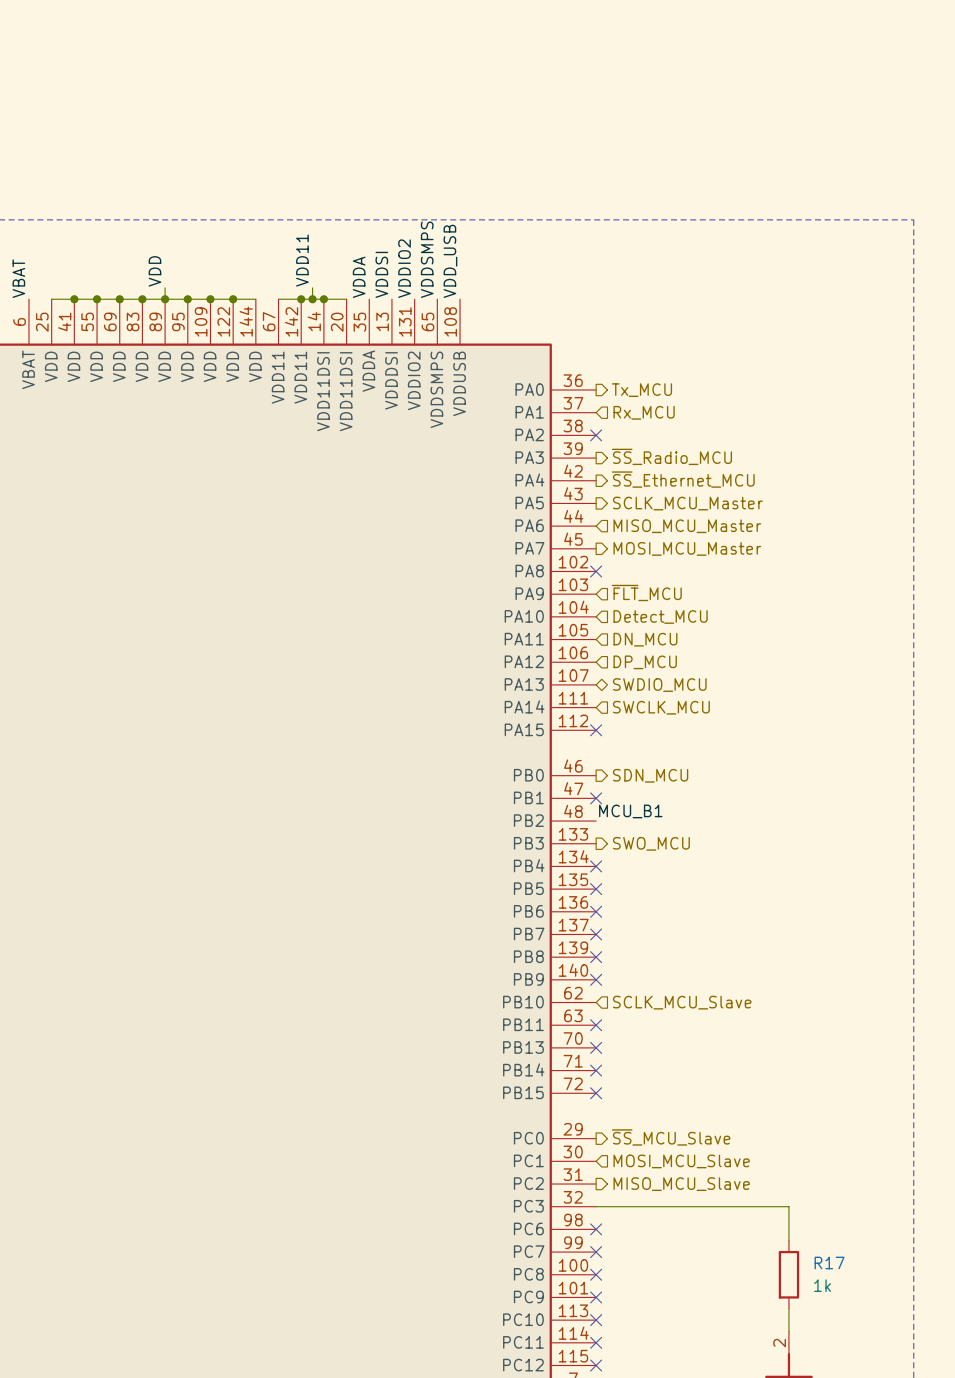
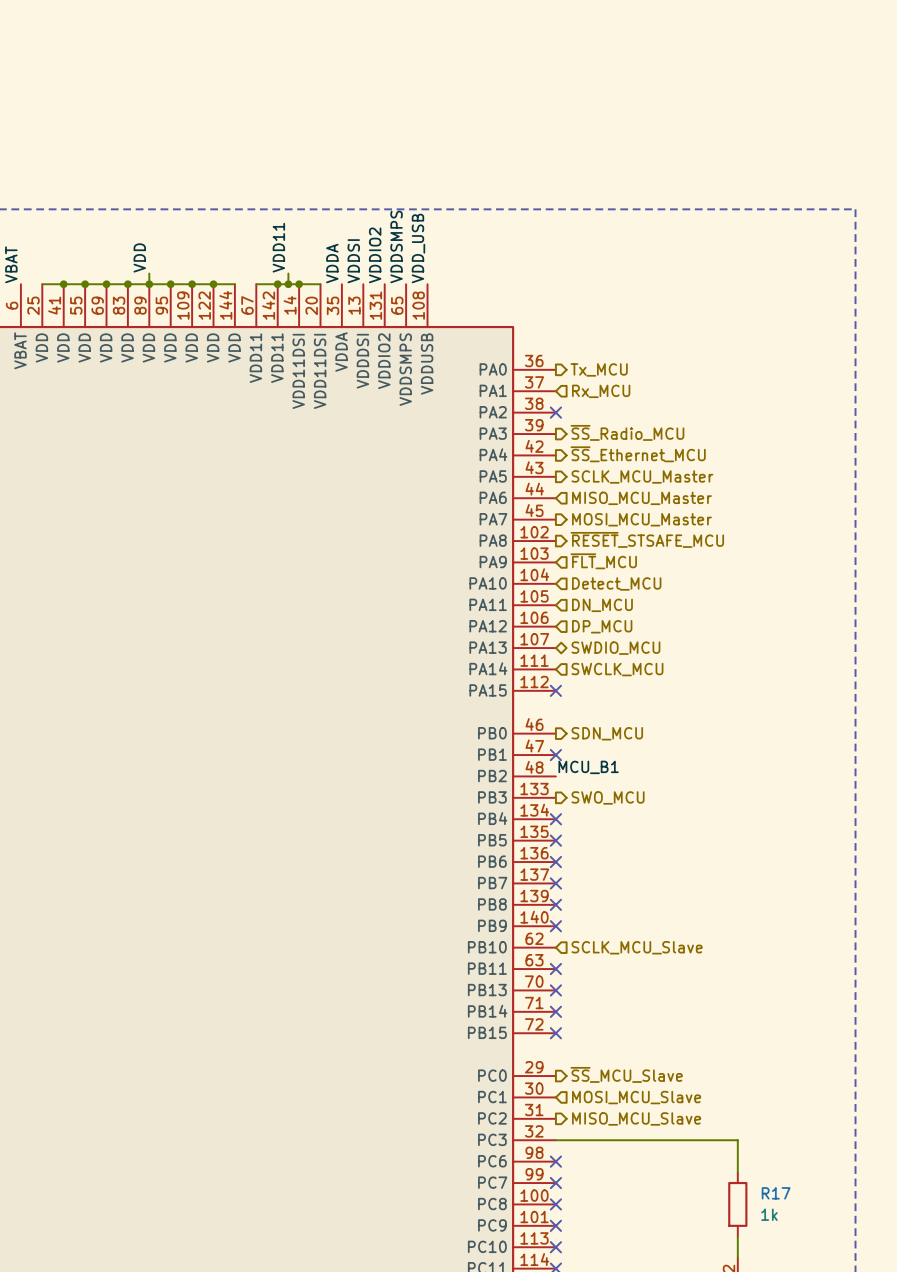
hierarchical label: none -> ~{RESET}_STSAFE_MCU (647, 539)
no-connect mark: (596, 571) -> none

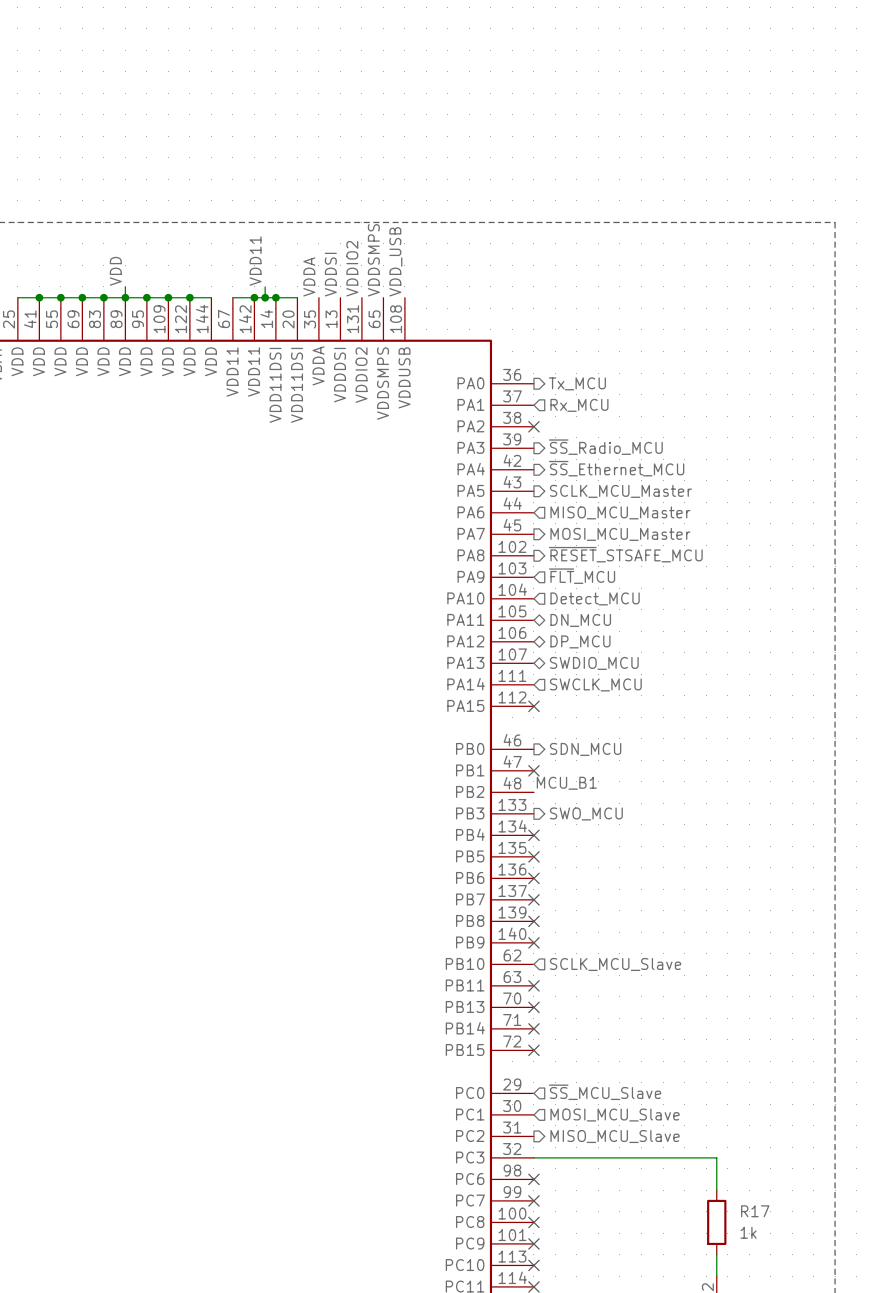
hierarchical label shape: input (602, 605) -> bidirectional (580, 620)
hierarchical label shape: input (602, 626) -> bidirectional (580, 641)
hierarchical label shape: output (626, 1074) -> input (605, 1092)

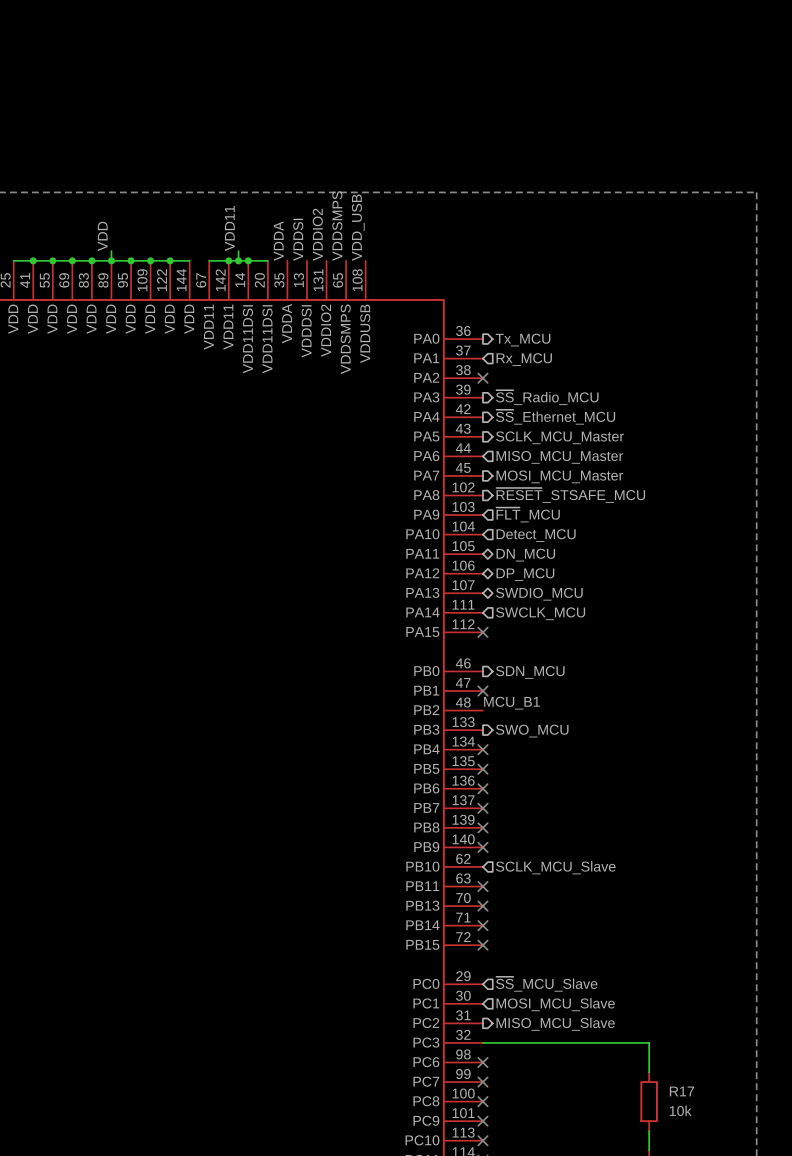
R17 value: 1k (748, 1232) -> 10k (680, 1110)

